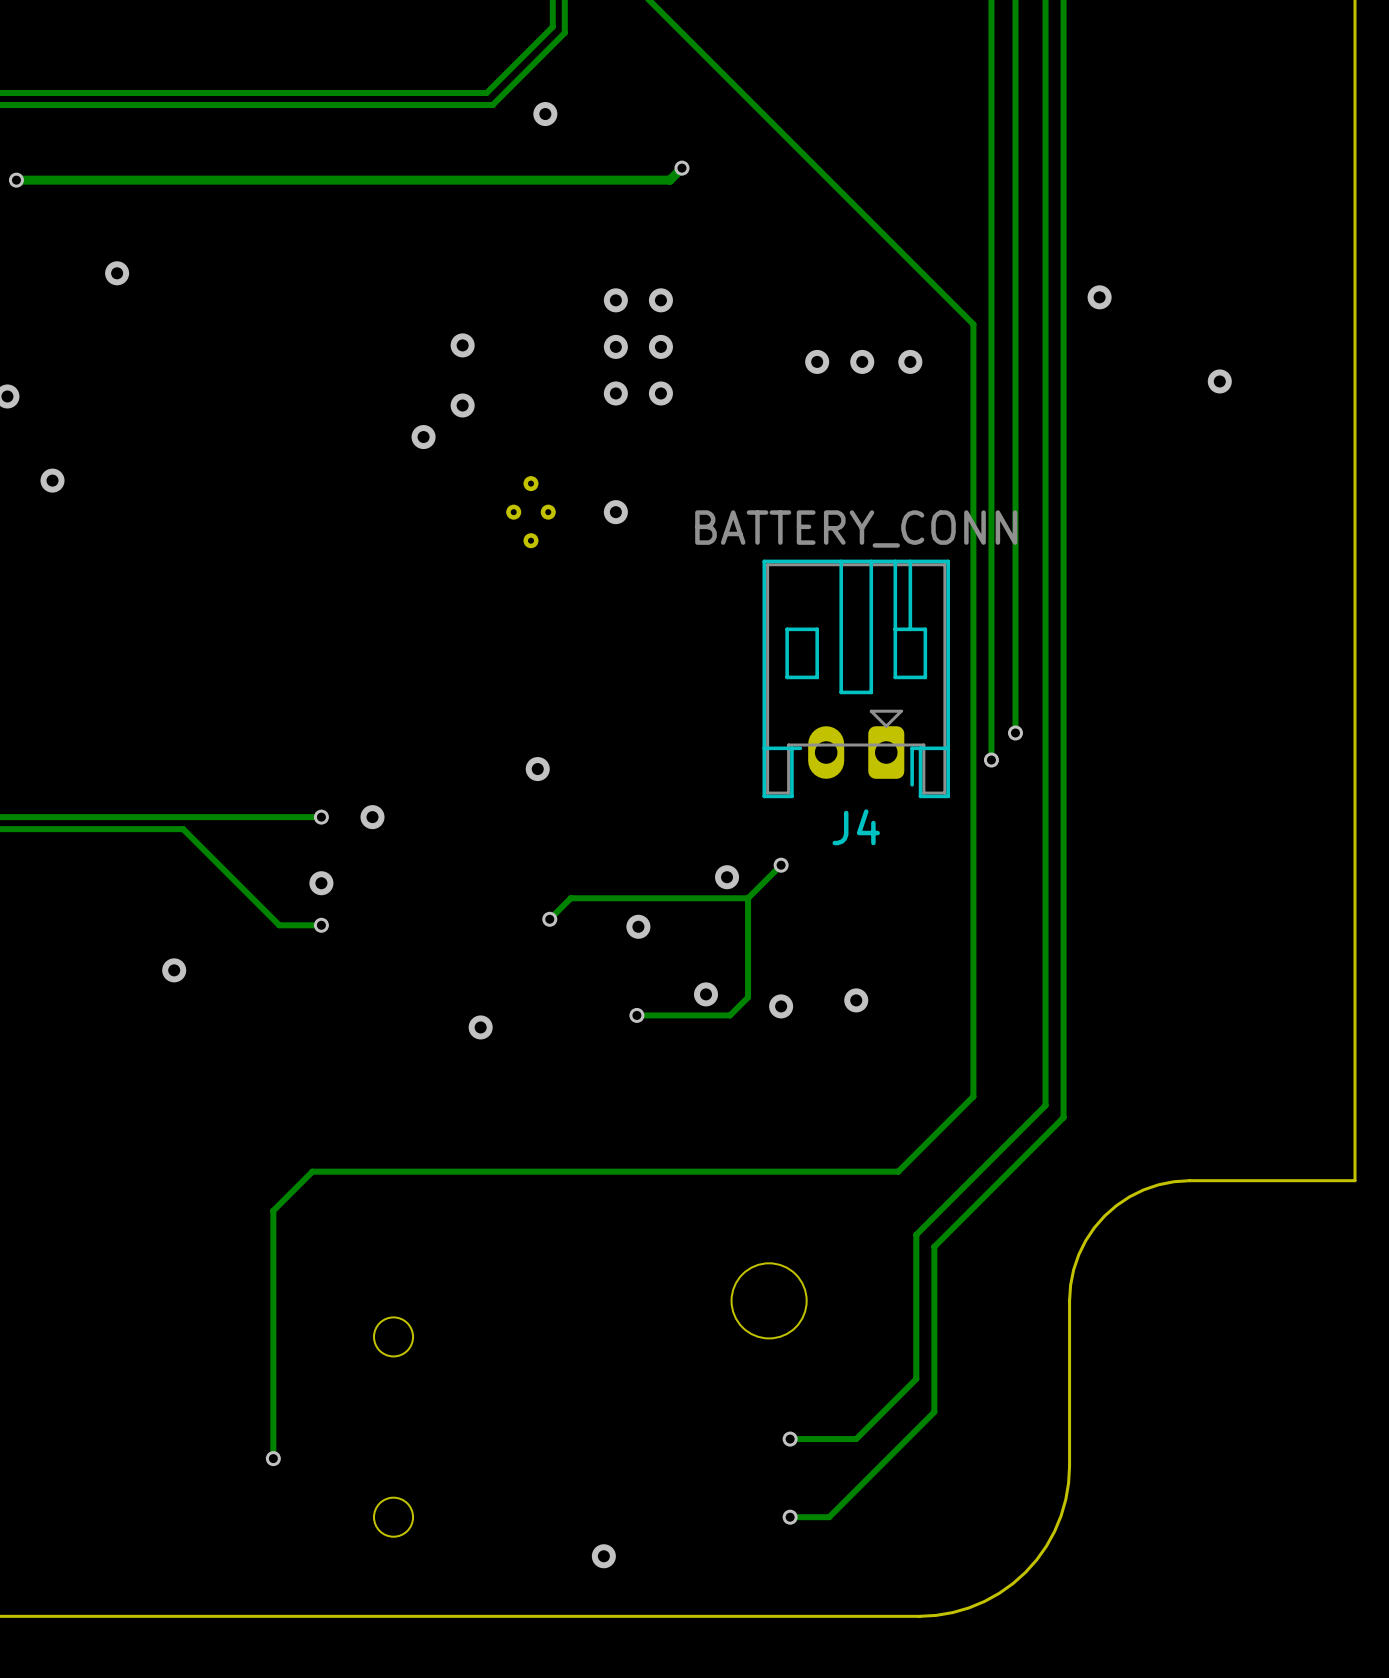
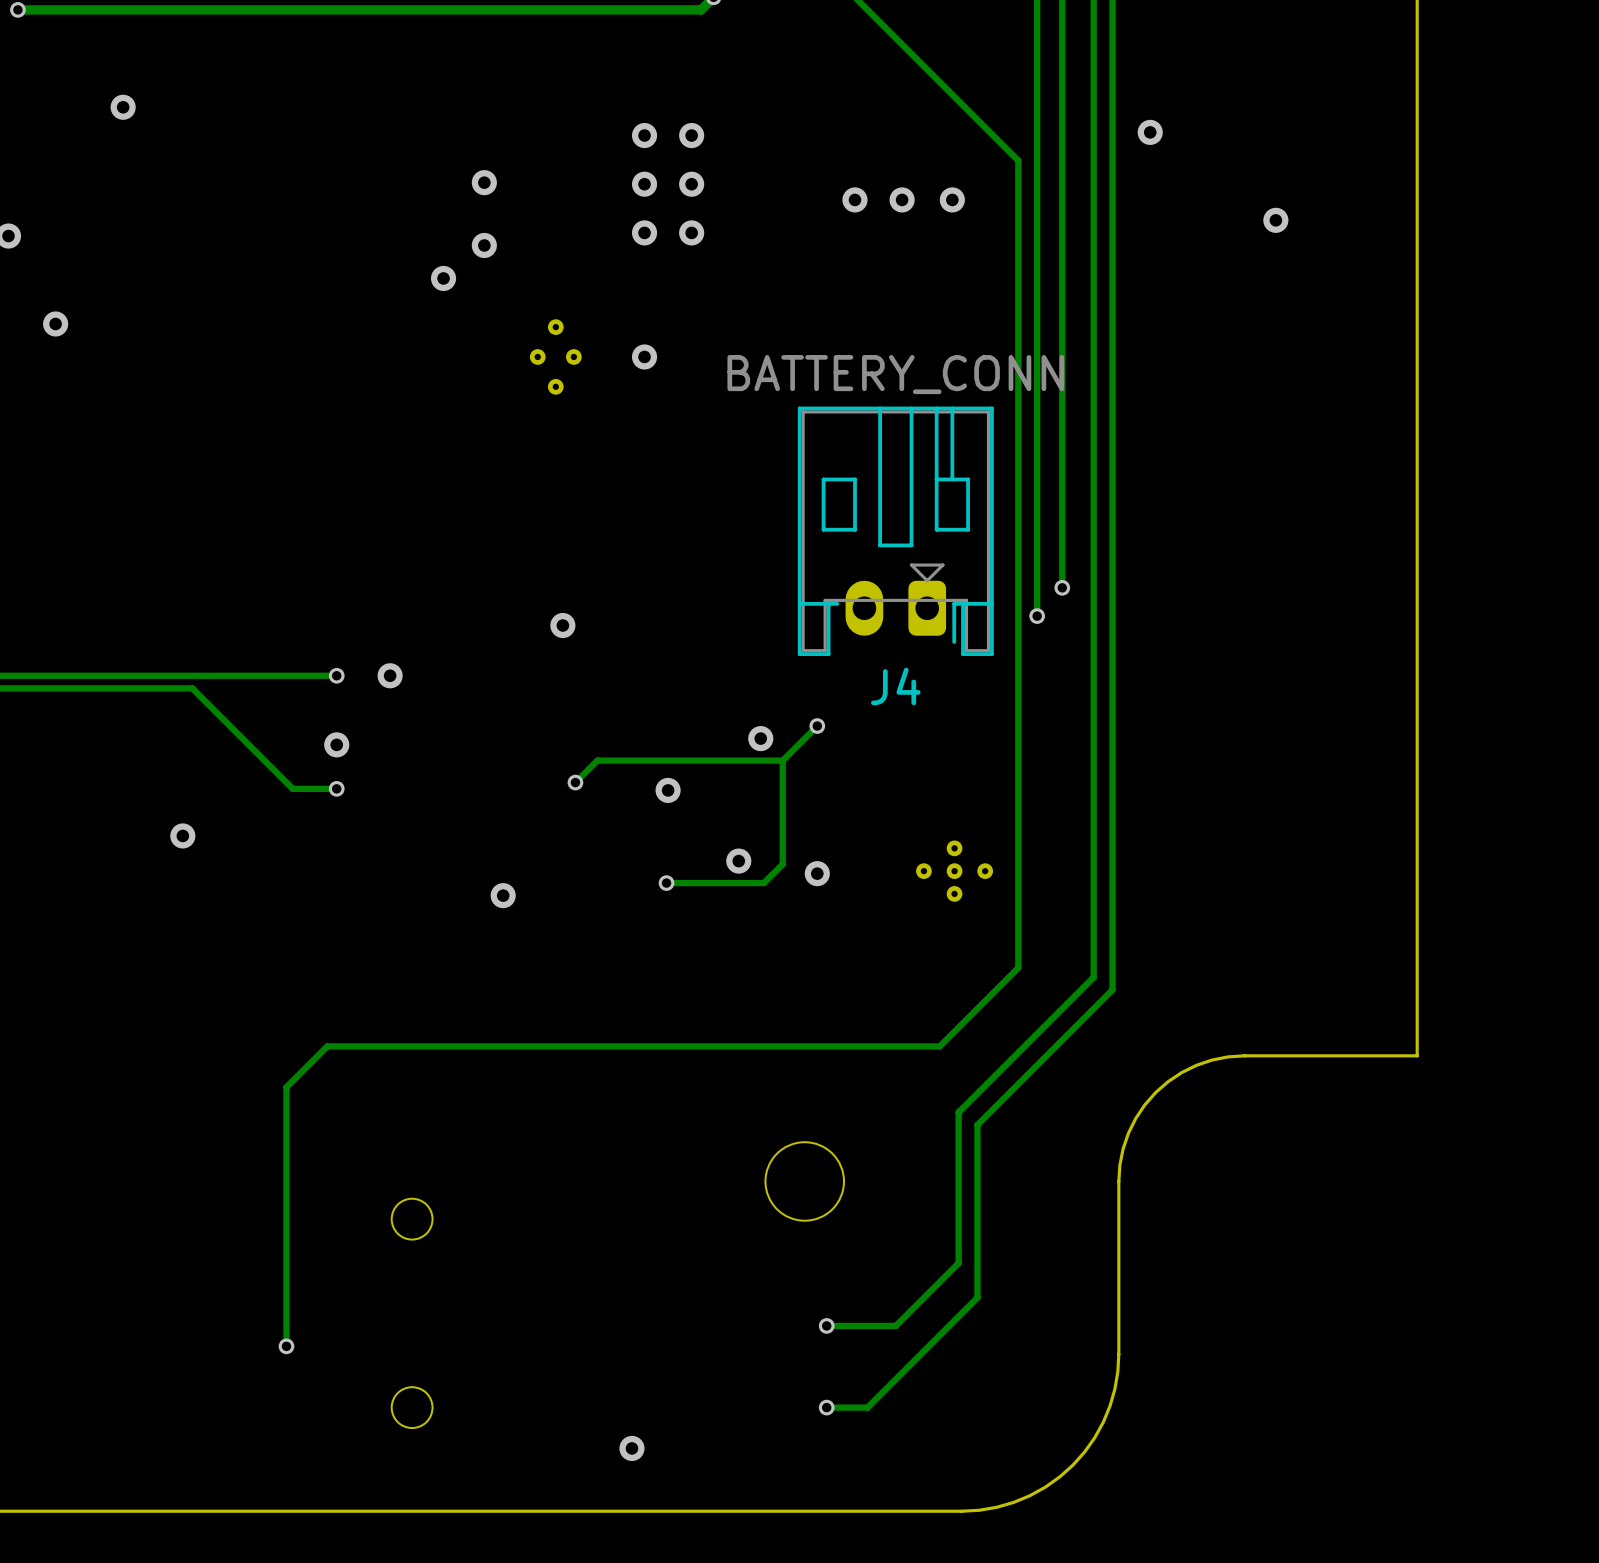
via: (856, 1000) -> none
part: none -> (954, 871)

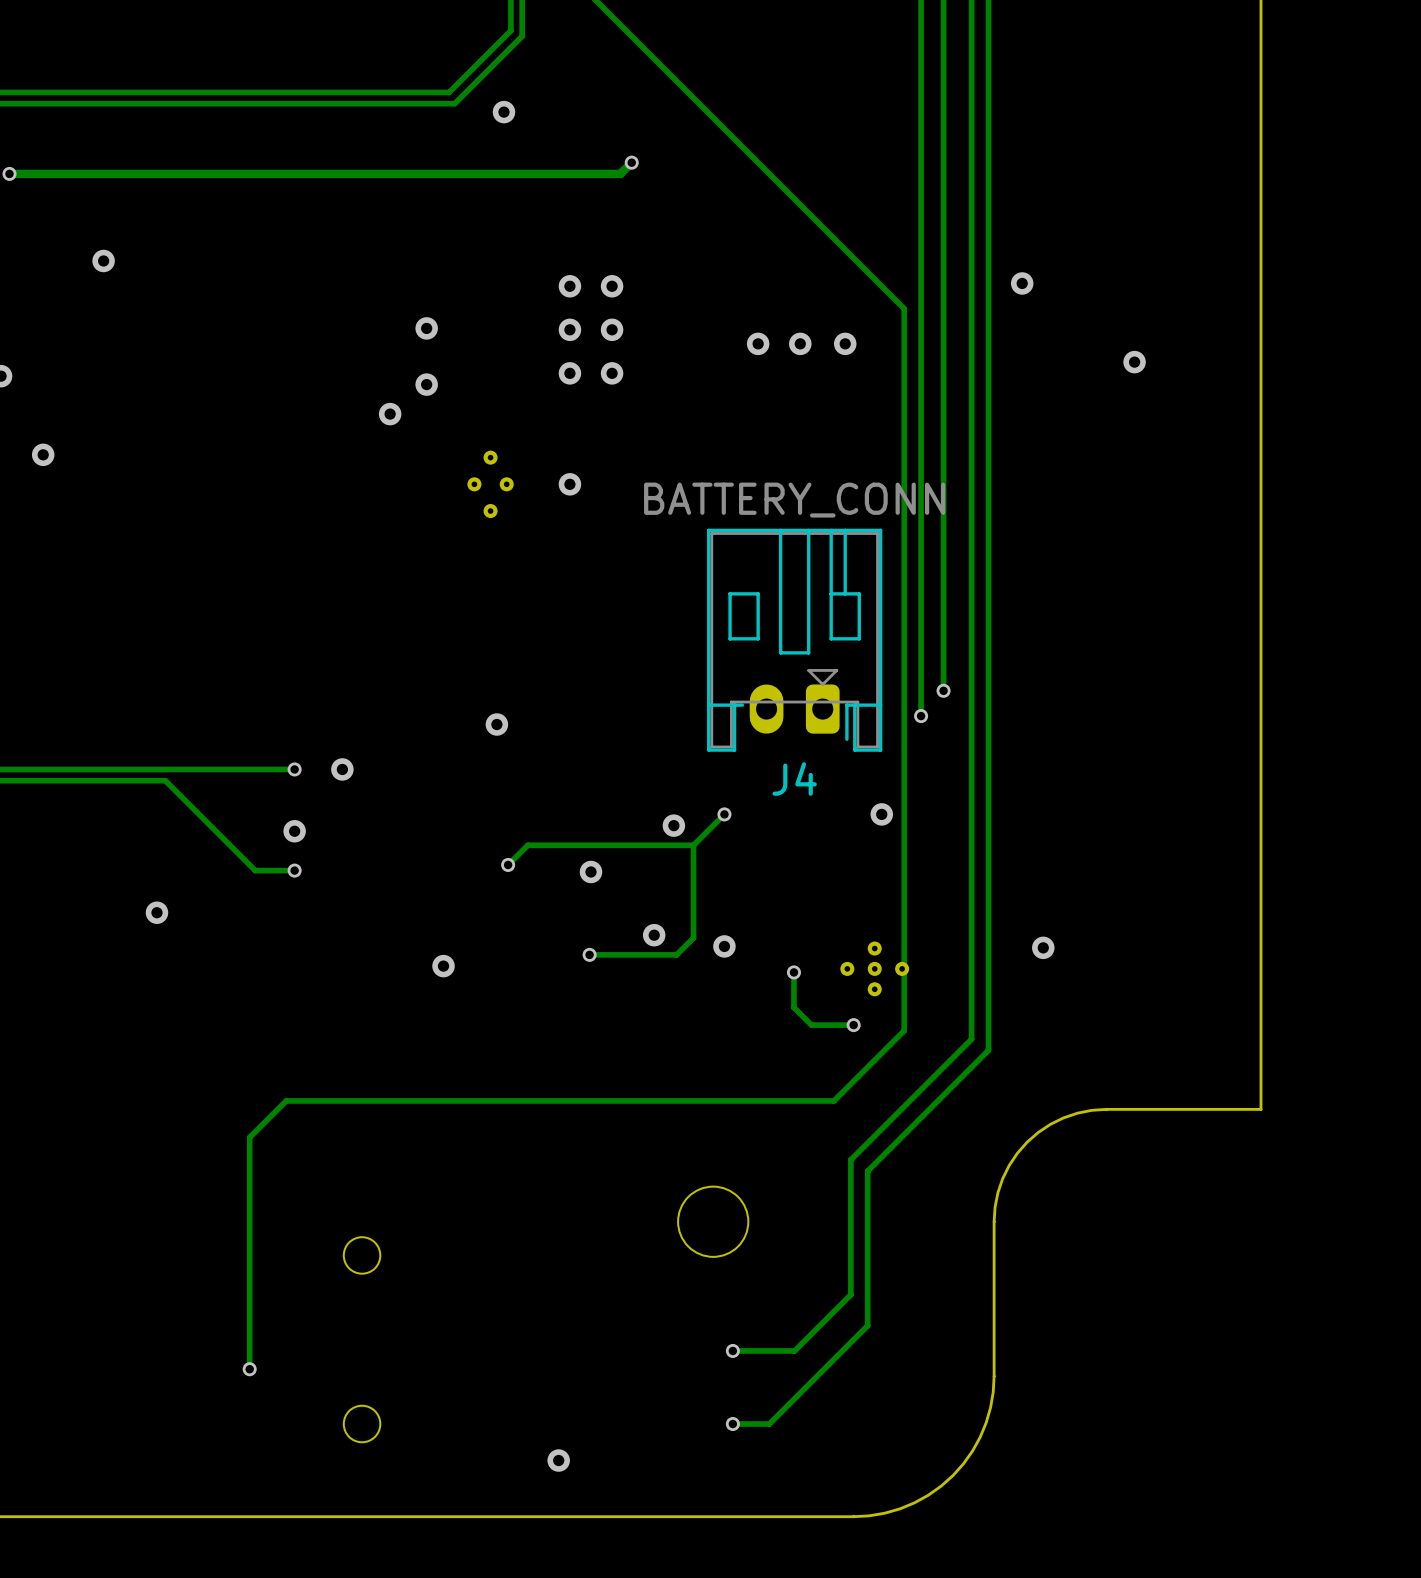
via: none -> (881, 814)
part position: (954, 871) -> (874, 968)
via: none -> (1043, 947)
track: none -> (793, 972) (793, 1007) (811, 1025) (853, 1025)
via: none -> (793, 972)
via: none -> (853, 1025)

